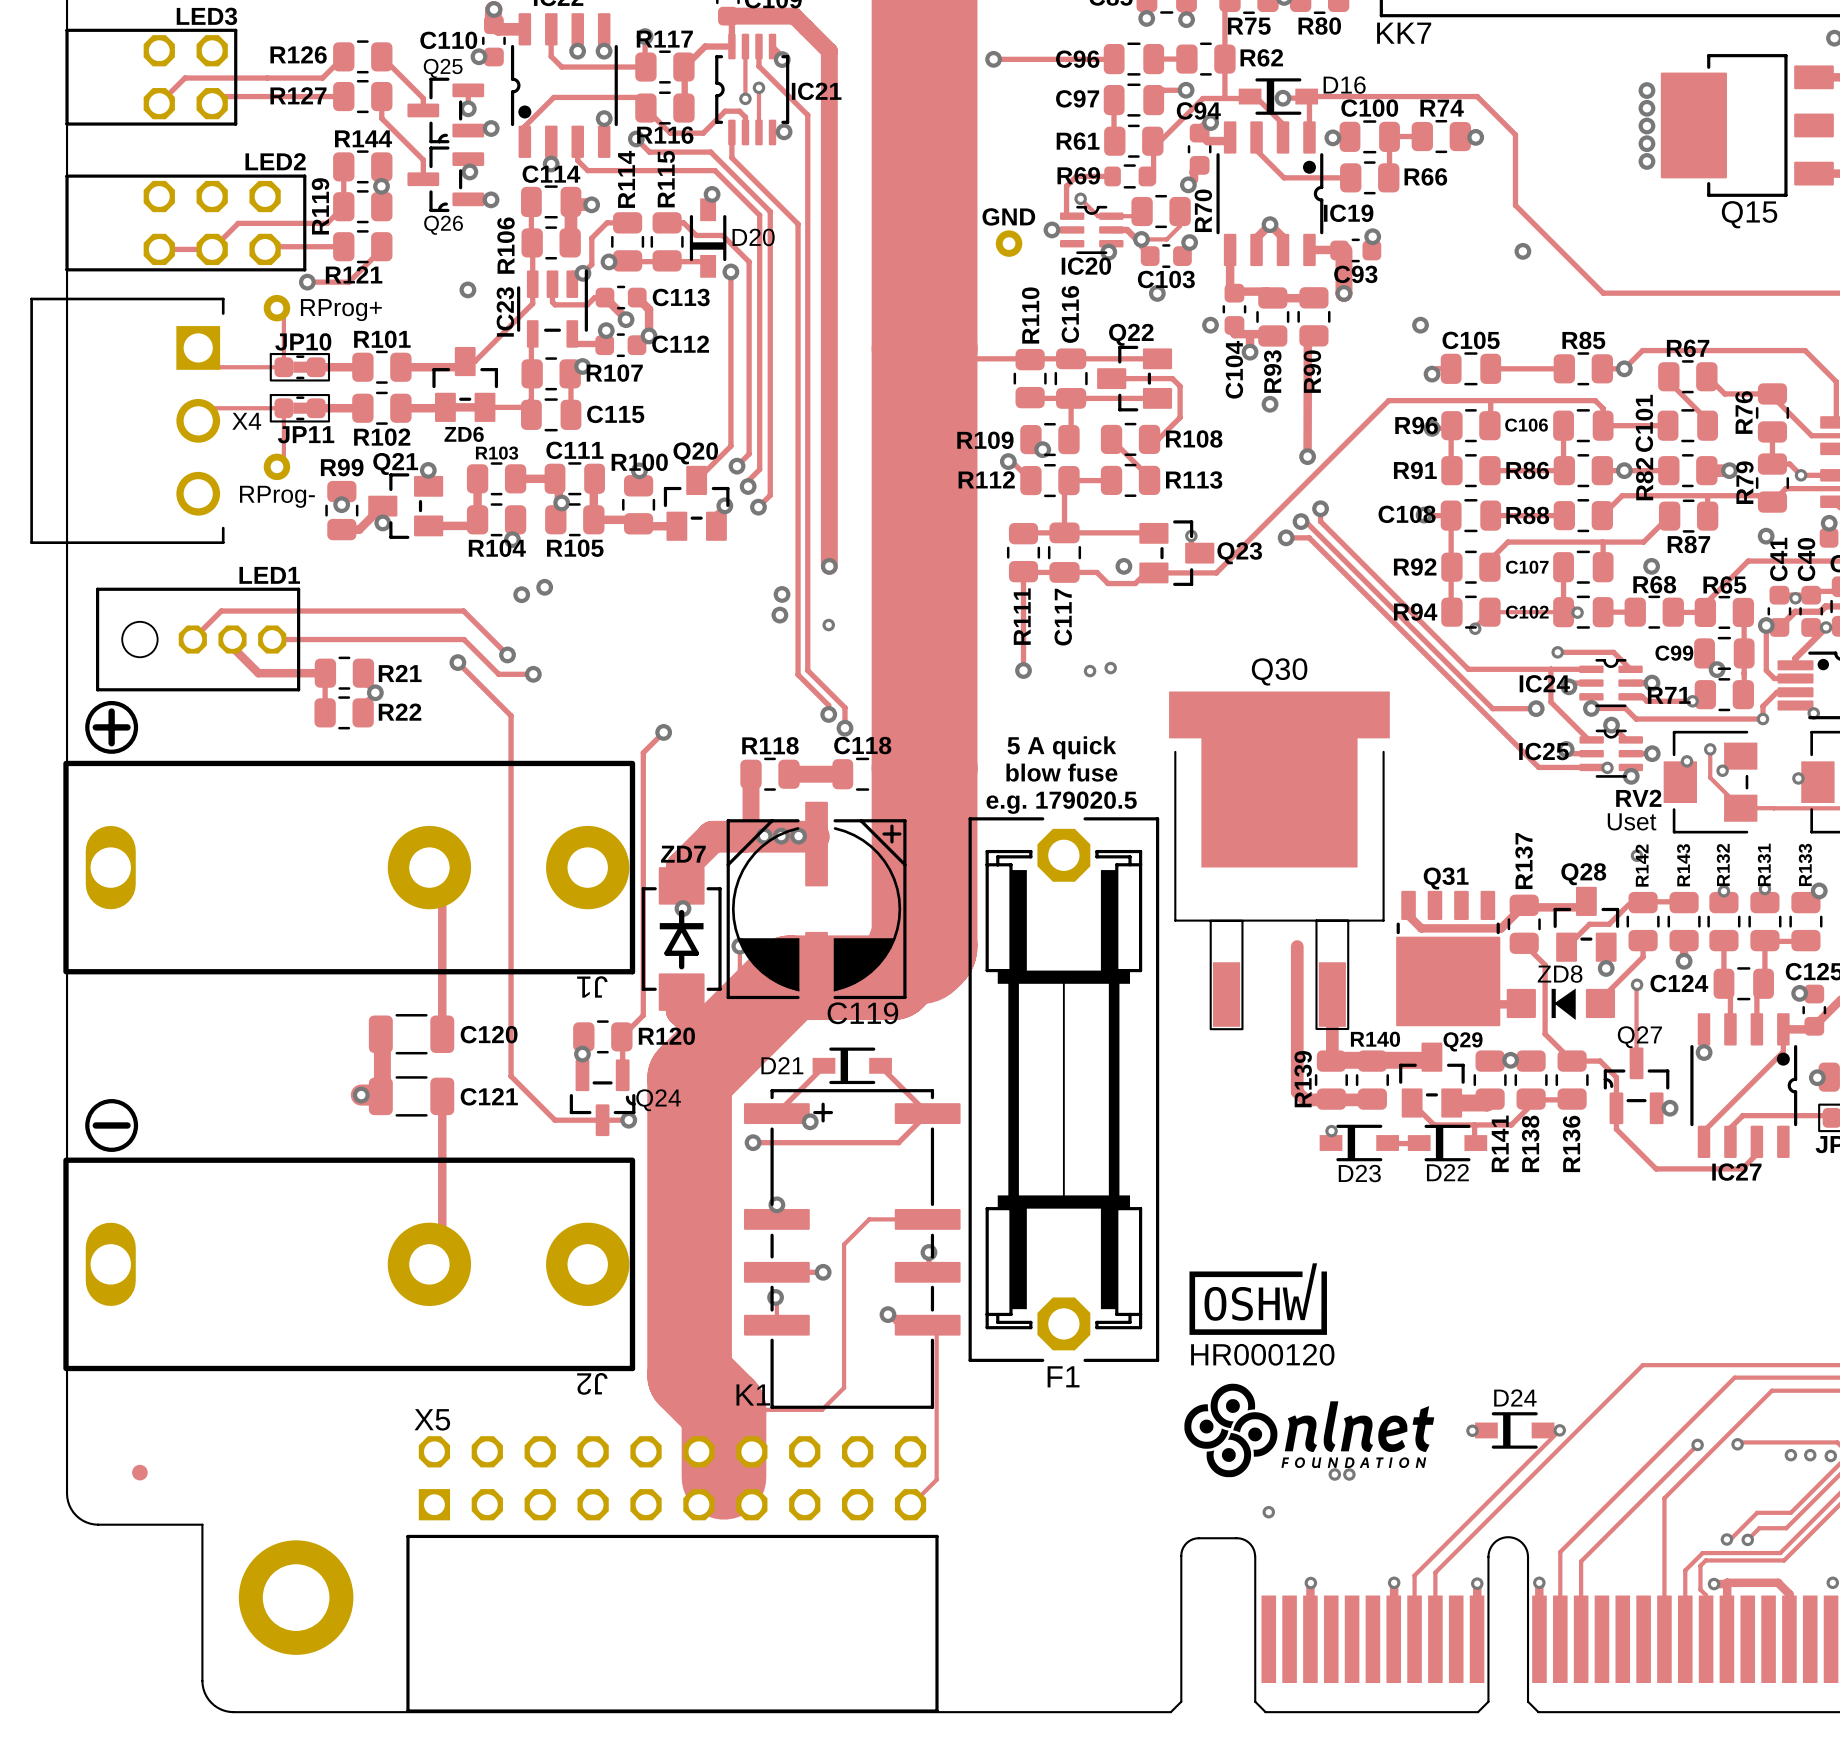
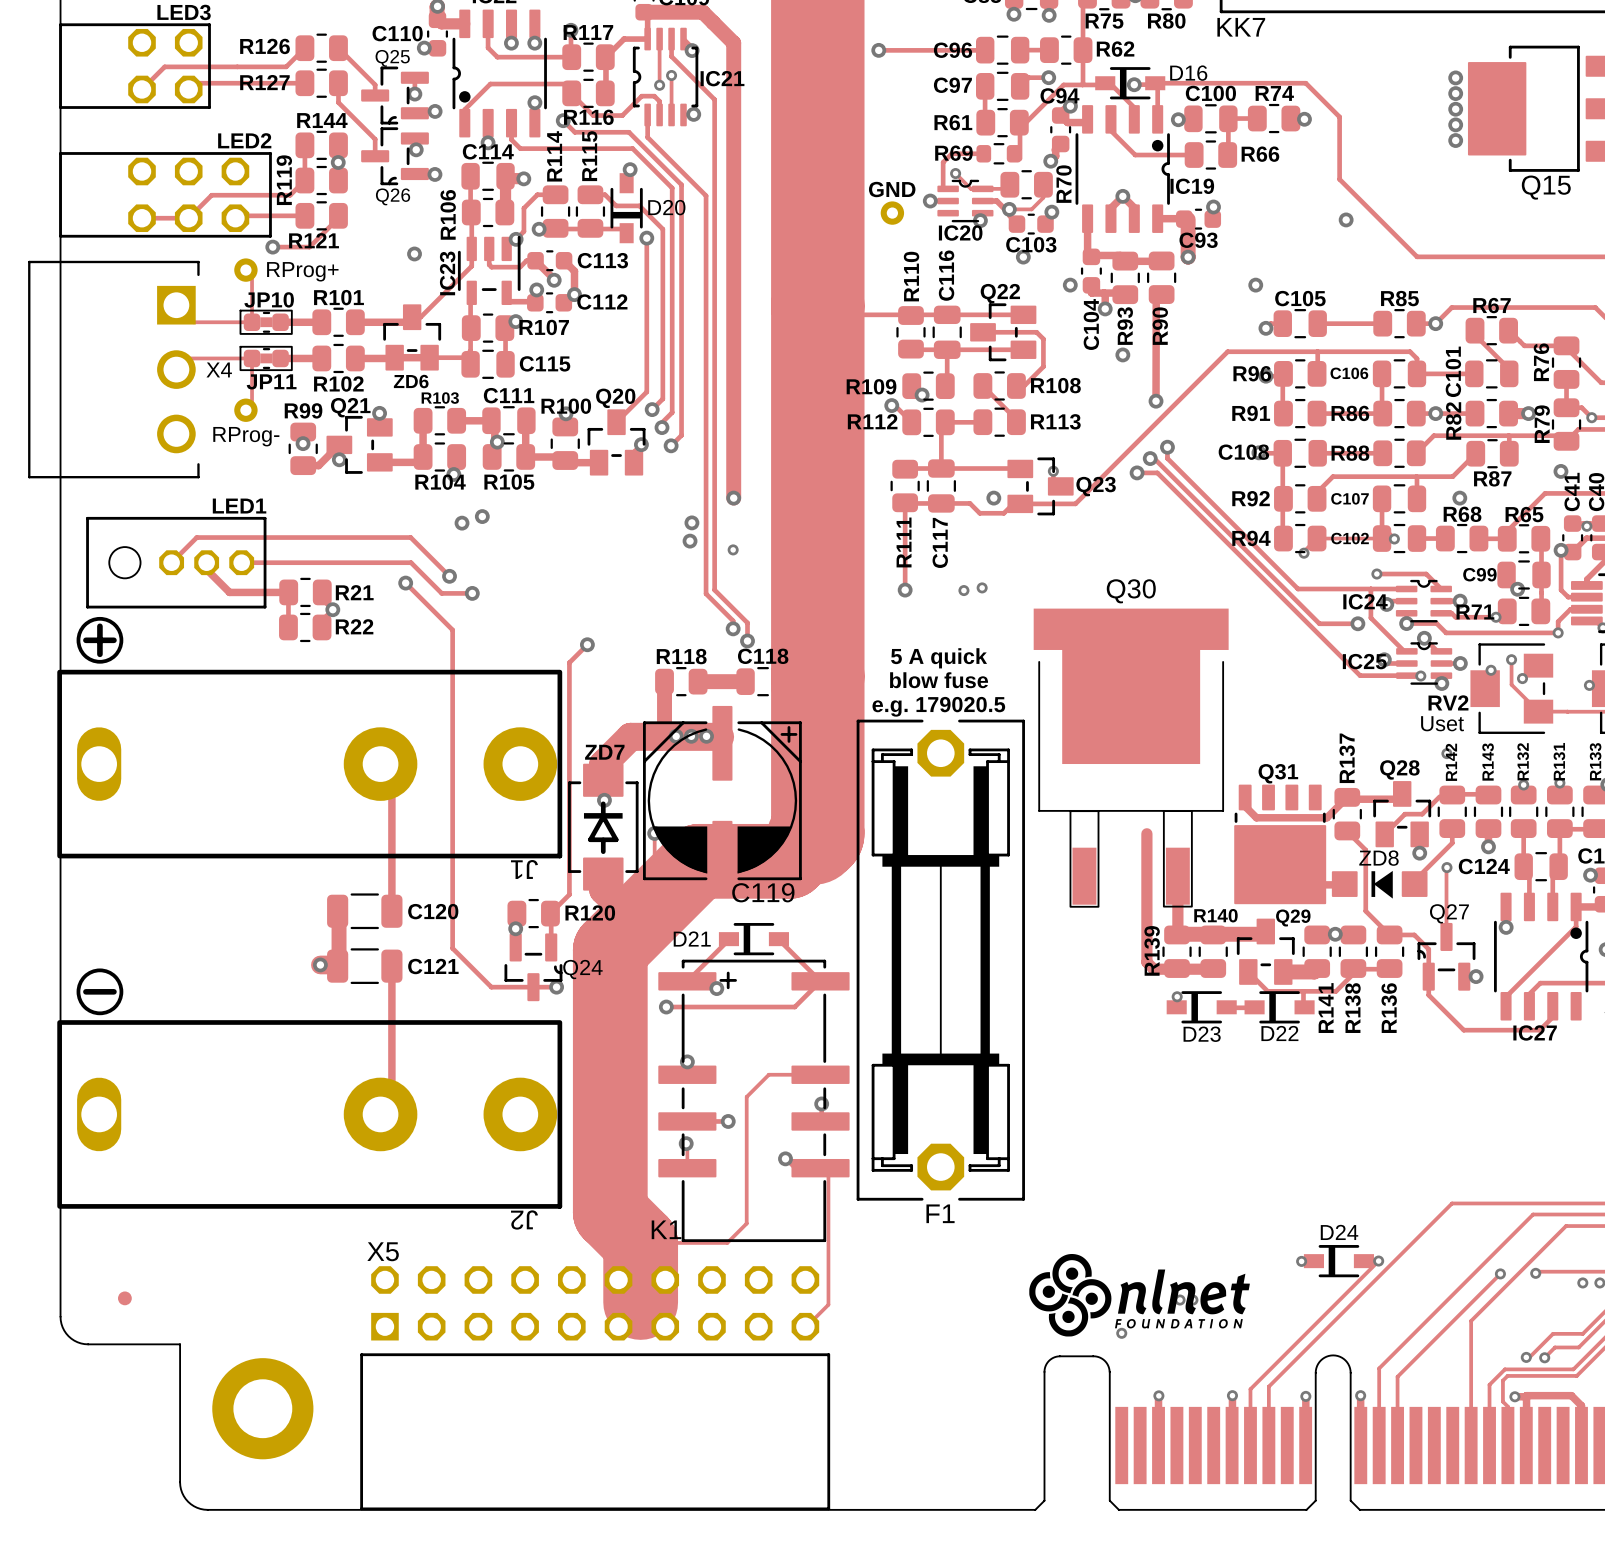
drawing: [1189, 1263, 1327, 1335] -> none
text: HR000120 (1262, 1354) -> none
drawing position: (1309, 1430) -> (1139, 1295)

